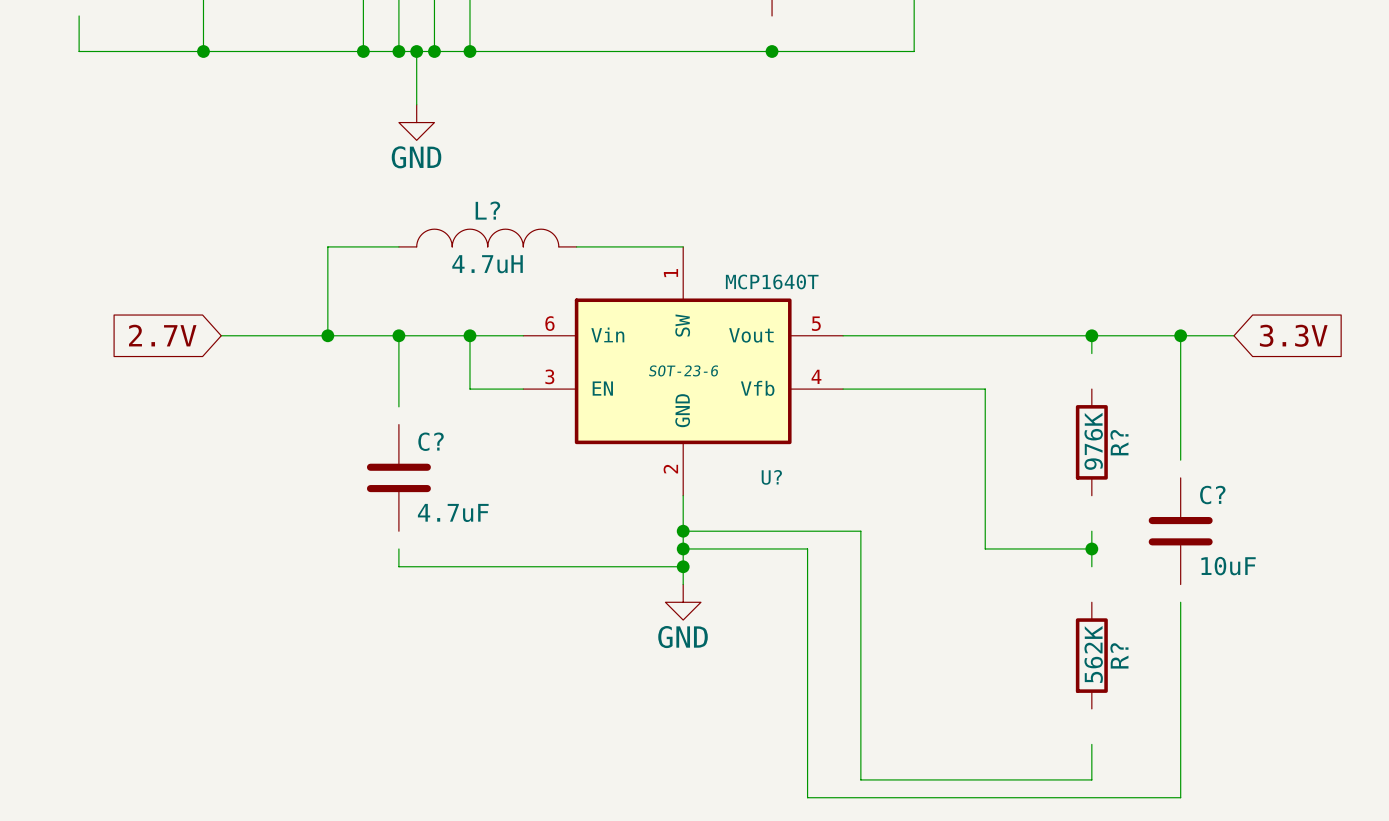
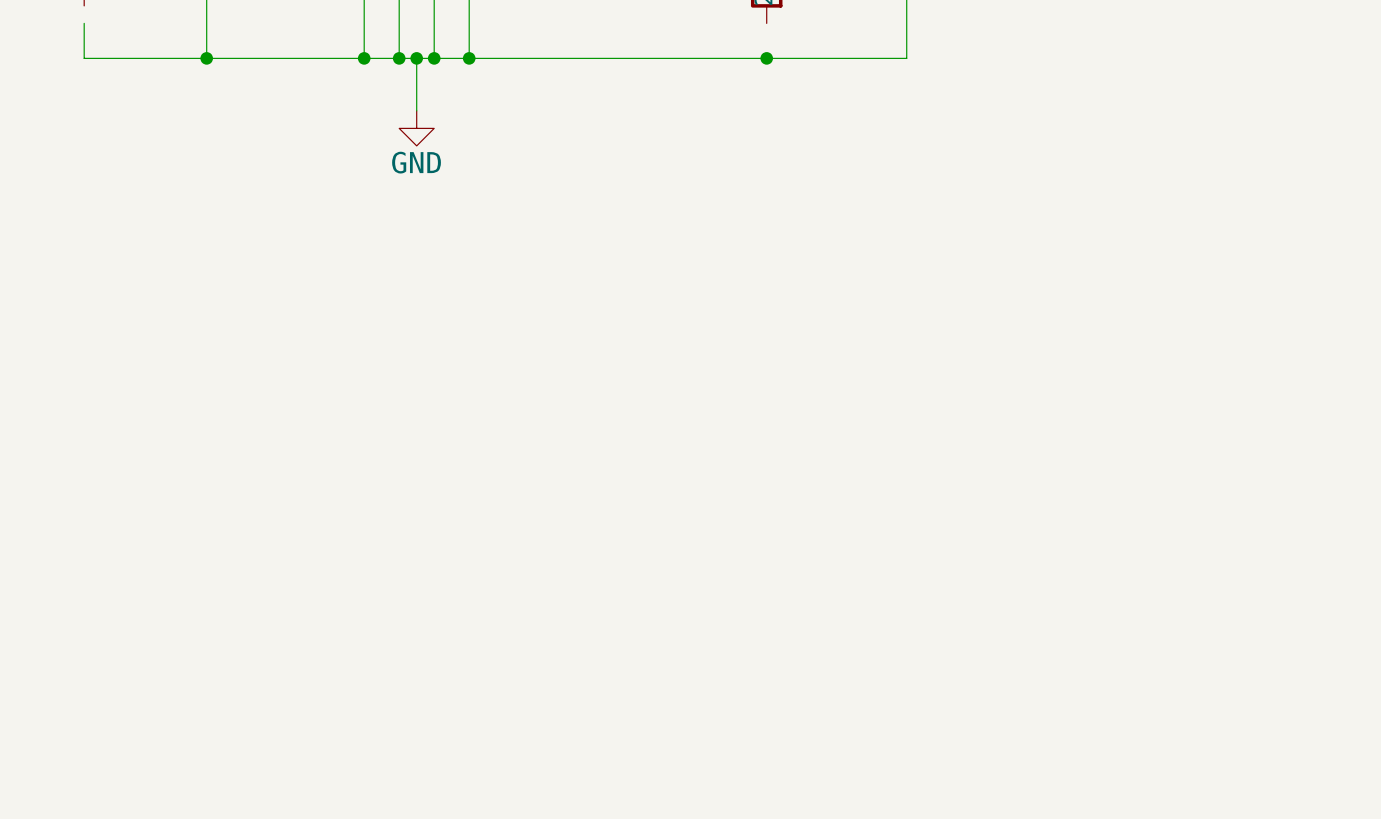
L?: 4.7uH (487, 238) -> none
wire: (398, 246) (327, 246) (327, 335) -> none
wire: (576, 246) (683, 246) -> none
global label: 2.7V (162, 335) -> none
wire: (221, 335) (523, 335) -> none
junction: (327, 335) -> none
wire: (398, 335) (398, 406) -> none
junction: (398, 335) -> none
wire: (469, 335) (469, 389) (523, 389) -> none
junction: (469, 335) -> none
wire: (843, 335) (1233, 335) -> none
wire: (1091, 335) (1091, 353) -> none
junction: (1091, 335) -> none
wire: (1180, 335) (1180, 460) -> none
junction: (1180, 335) -> none
global label: 3.3V (1293, 335) -> none
U?: MCP1640T (683, 371) -> none
wire: (843, 389) (985, 389) (985, 548) (1091, 548) -> none
R?: 976K (1091, 442) -> none
C?: 4.7uF (398, 477) -> none
wire: (683, 495) (683, 584) -> none
wire: (683, 531) (860, 531) (860, 779) (1091, 779) (1091, 744) -> none
junction: (683, 531) -> none
wire: (1091, 531) (1091, 566) -> none
C?: 10uF (1180, 531) -> none
wire: (398, 548) (398, 566) (683, 566) -> none
wire: (683, 548) (807, 548) (807, 797) (1180, 797) (1180, 602) -> none
junction: (683, 548) -> none
junction: (1091, 548) -> none
junction: (683, 566) -> none
power symbol: GND (683, 602) -> none
R?: 562K (1091, 655) -> none

